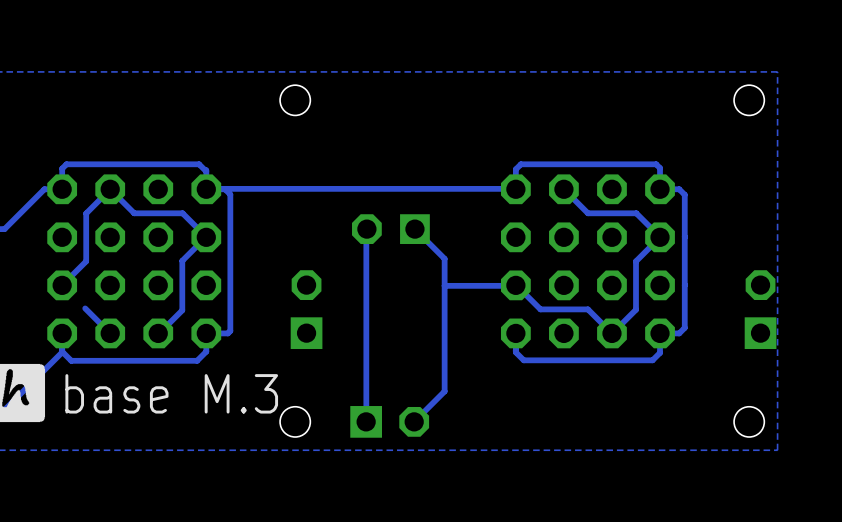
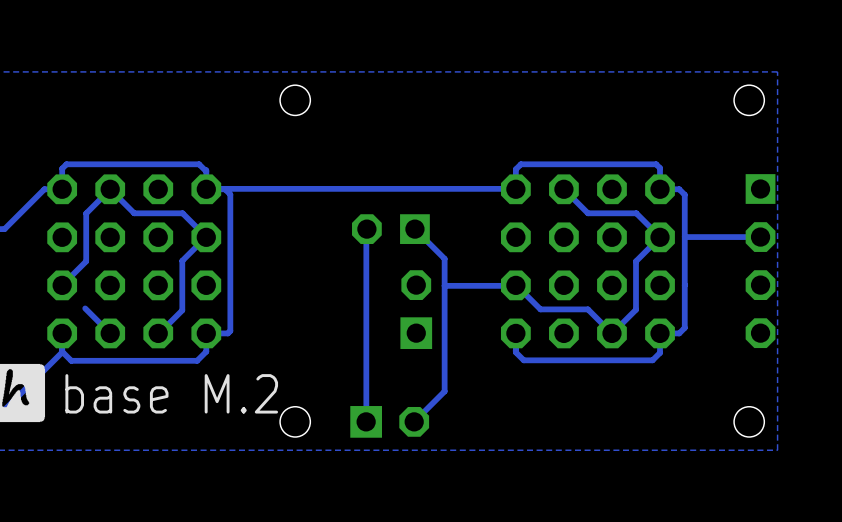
track: none -> (760, 237) (685, 237)
part: none -> (760, 261)
part position: (306, 309) -> (416, 309)
part: (760, 309) -> none
text: base M.3 (171, 393) -> base M.2 (171, 393)

